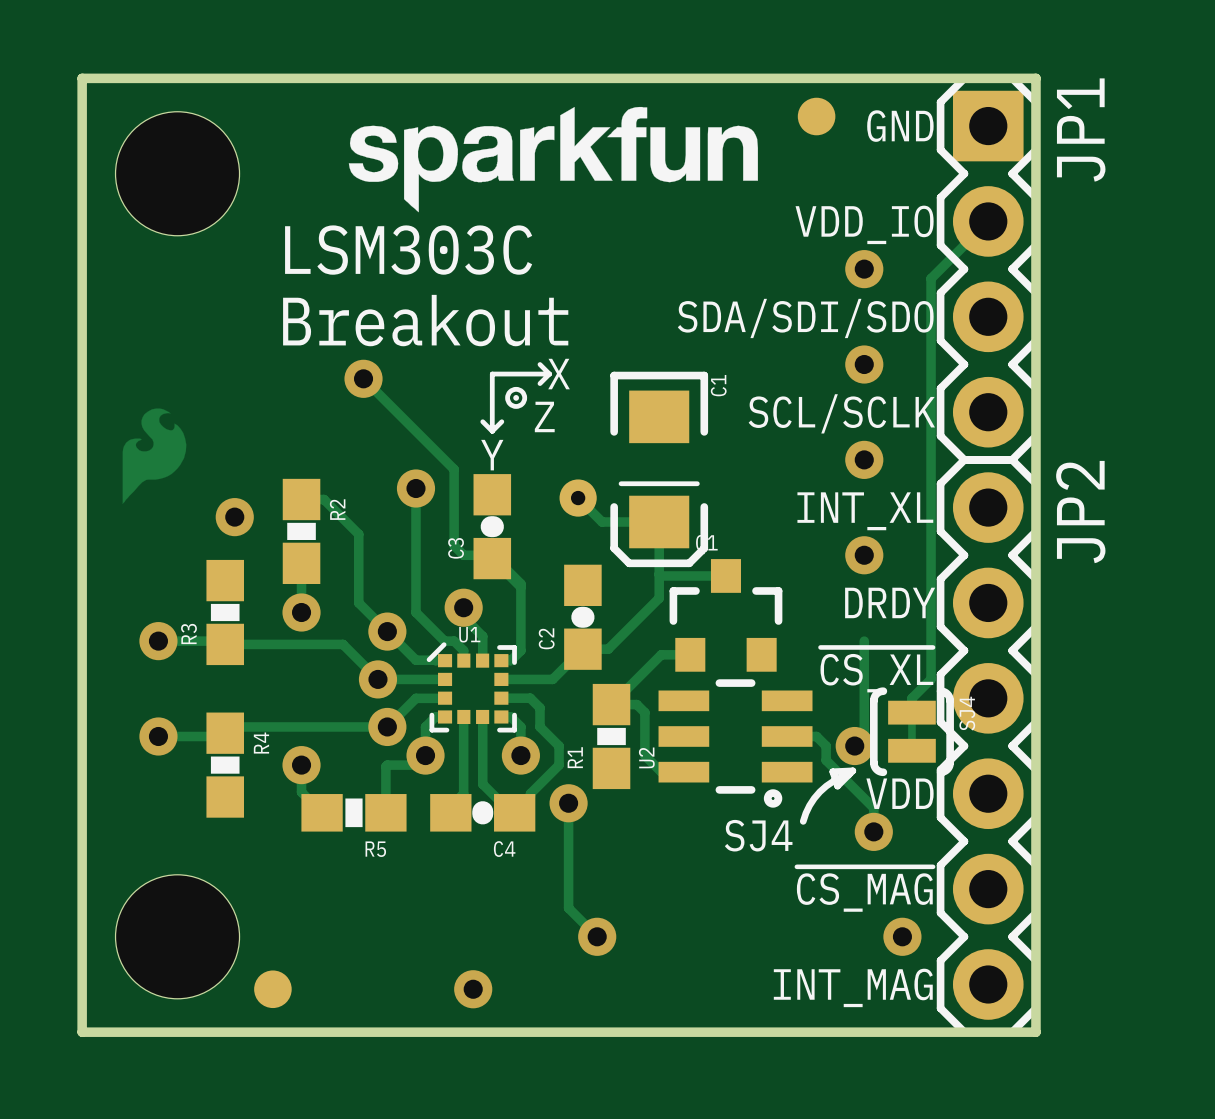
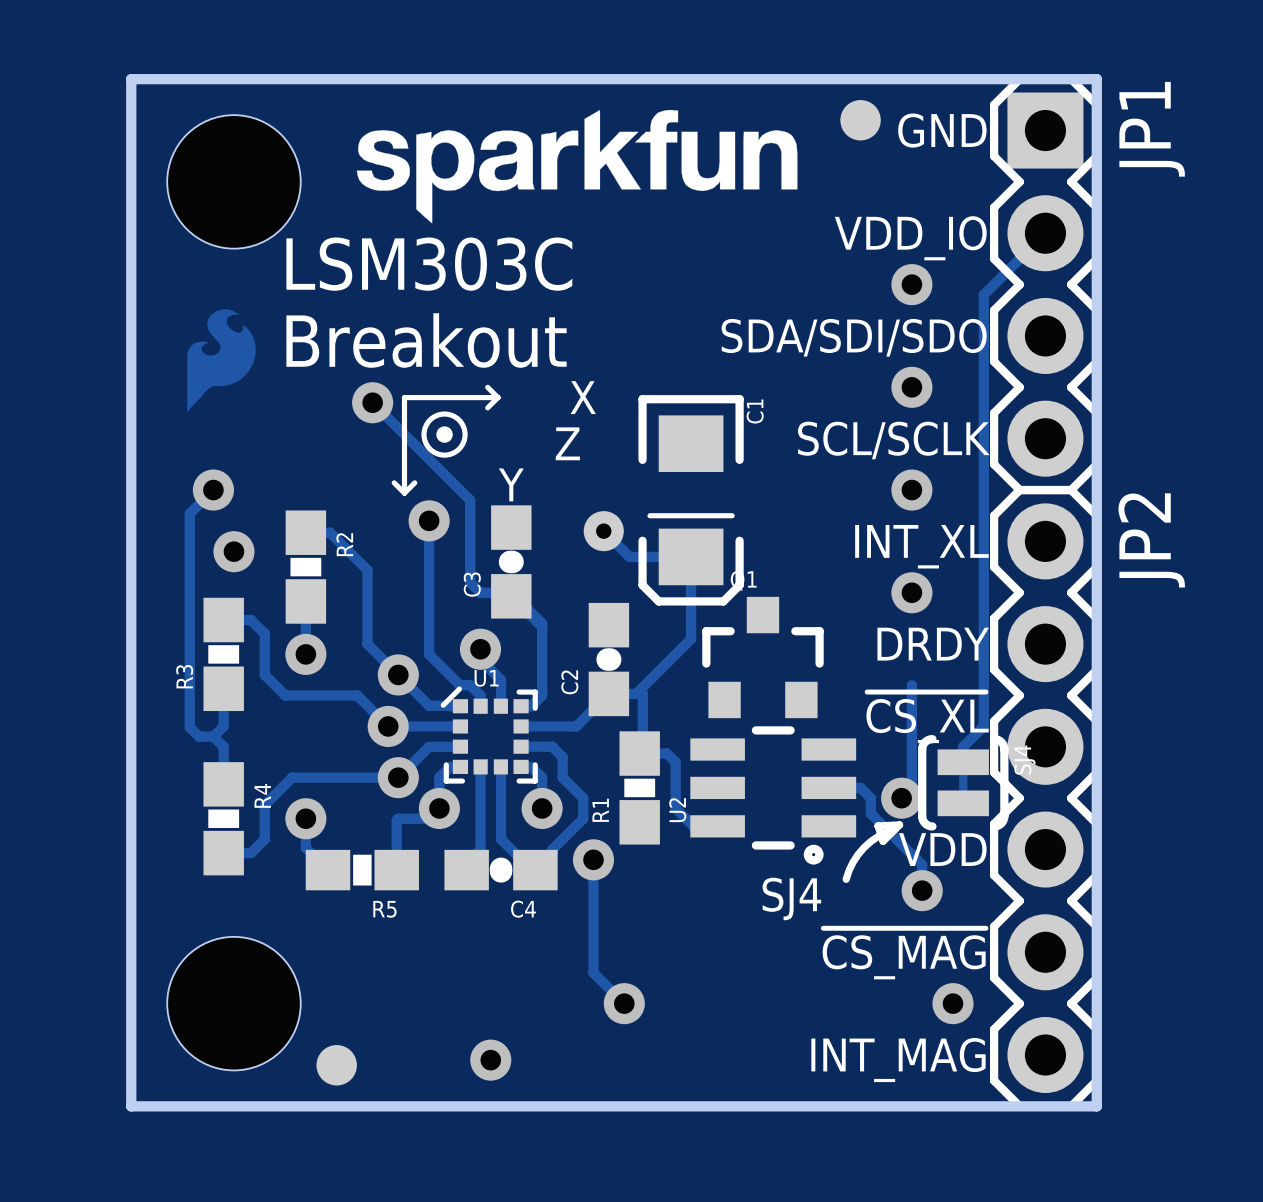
board edge: (139, 78) (82, 78) (82, 1032) (139, 1032) -> (131, 79) (131, 1106)
part position: (177, 173) -> (233, 181)
drawing: none -> [187, 309, 256, 413]
line: (539, 364) (549, 374) -> (487, 387) (497, 397)
line: none -> (497, 397) (404, 397) (404, 493)
line: (549, 374) (539, 383) -> (497, 397) (487, 407)
line: (549, 374) (492, 374) (492, 431) -> none
drawing: none -> [421, 411, 468, 458]
drawing: [505, 386, 528, 409] -> none
drawing: [122, 408, 187, 505] -> none
line: (482, 421) (492, 431) -> (394, 482) (404, 493)
line: (501, 421) (492, 431) -> (414, 482) (404, 493)
track: none -> (213, 490) (189, 513) (189, 727) (199, 736) (213, 736)
via: none -> (213, 490)
track: (659, 574) (660, 575) (725, 575) -> none
track: (158, 641) (221, 641) (225, 644) (342, 644) (349, 650) -> (223, 620) (250, 620) (264, 633) (264, 674) (285, 695) (357, 695)
via: (158, 641) -> none
track: none -> (223, 688) (223, 726) (213, 736)
track: (690, 654) (661, 654) (611, 704) (614, 704) -> (636, 693) (642, 693) (642, 753)
track: none -> (213, 736) (223, 746) (223, 784)
track: (288, 726) (231, 726) (221, 736) (158, 736) -> (292, 777) (264, 804) (264, 839) (250, 853) (223, 853)
via: (158, 736) -> none
part position: (177, 936) -> (233, 1003)
part position: (272, 989) -> (336, 1065)

